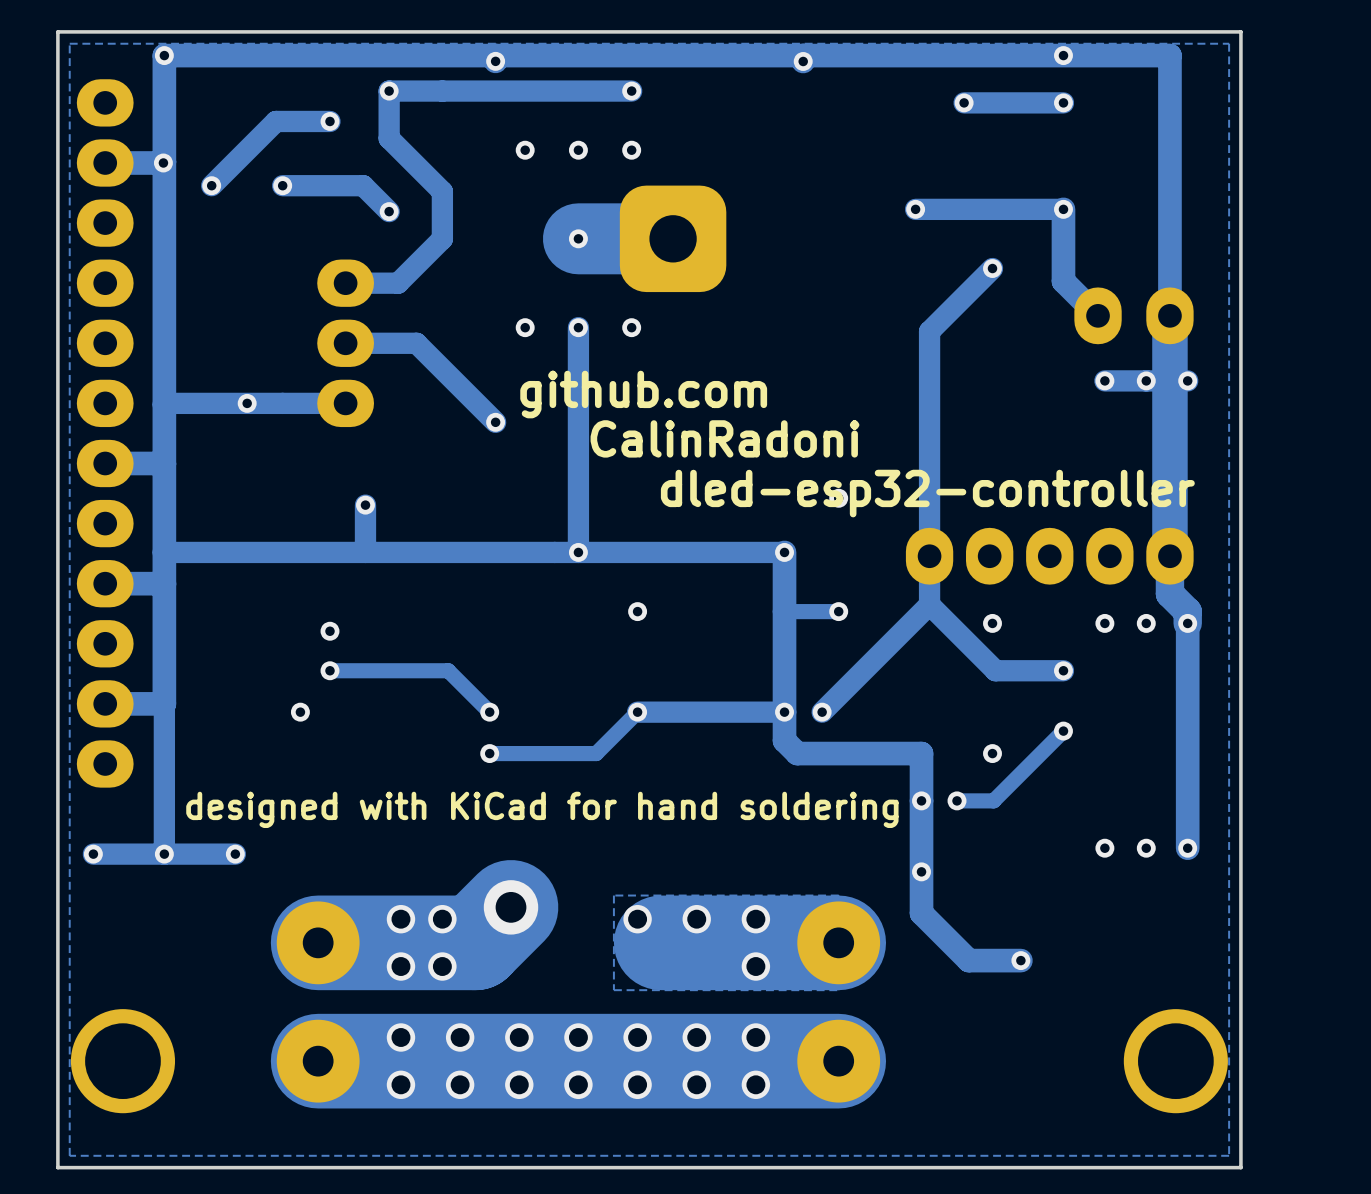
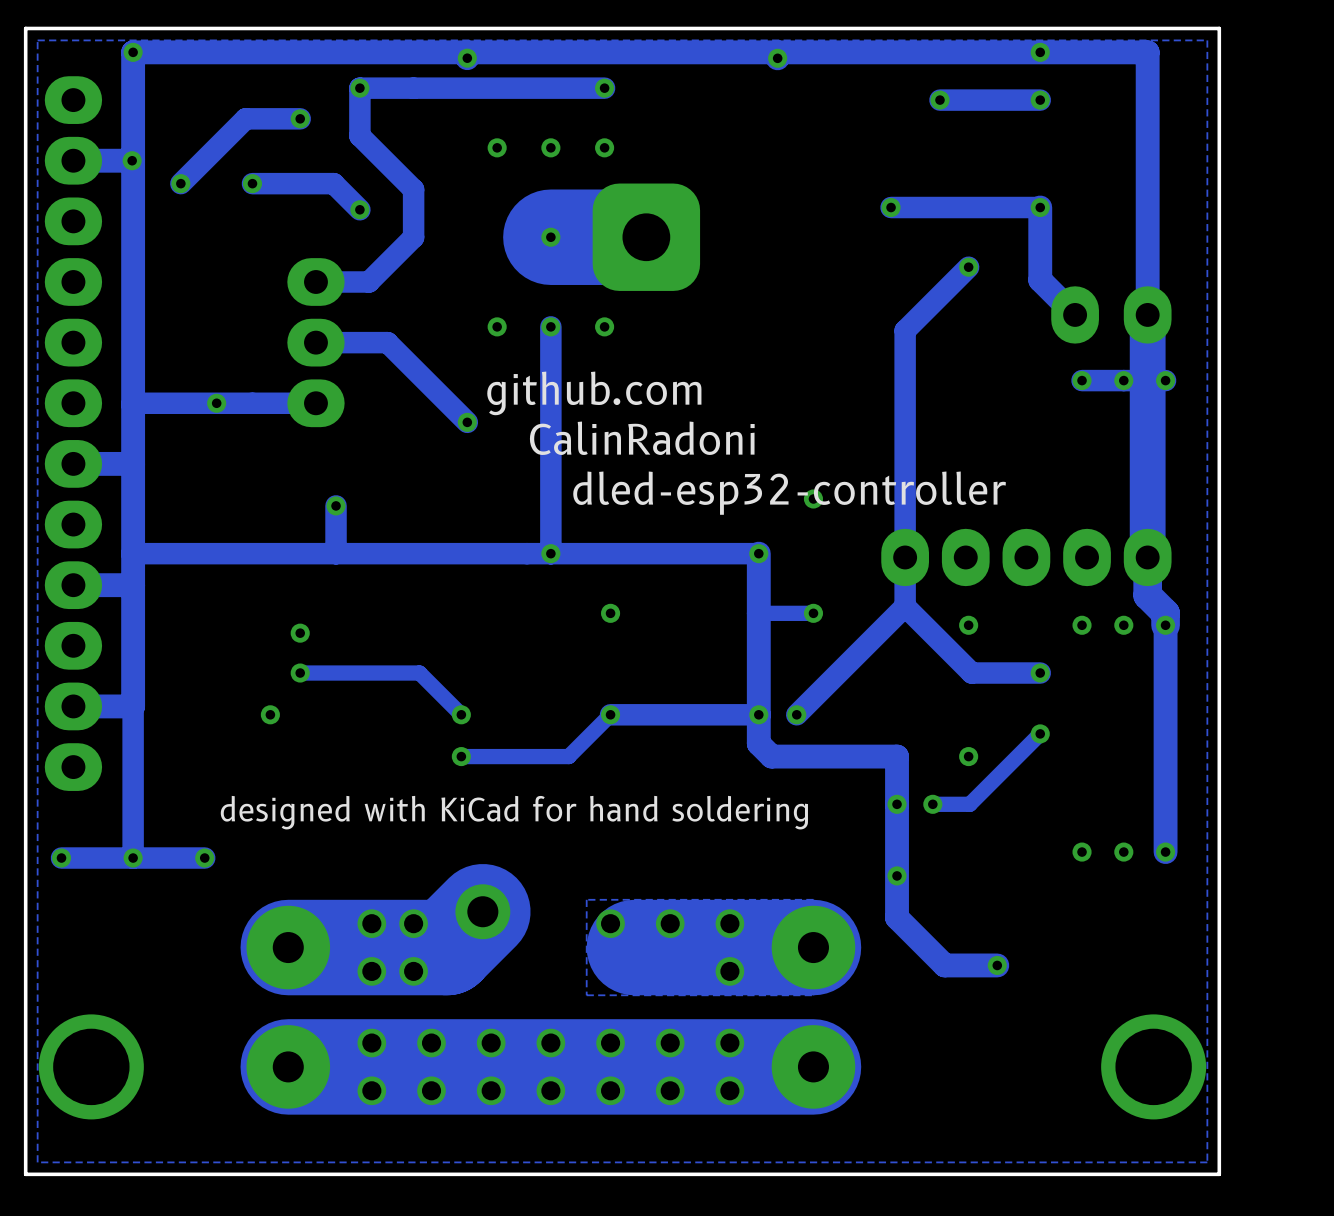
track width: thin (673, 238) (578, 238) -> thick (646, 237) (550, 237)

